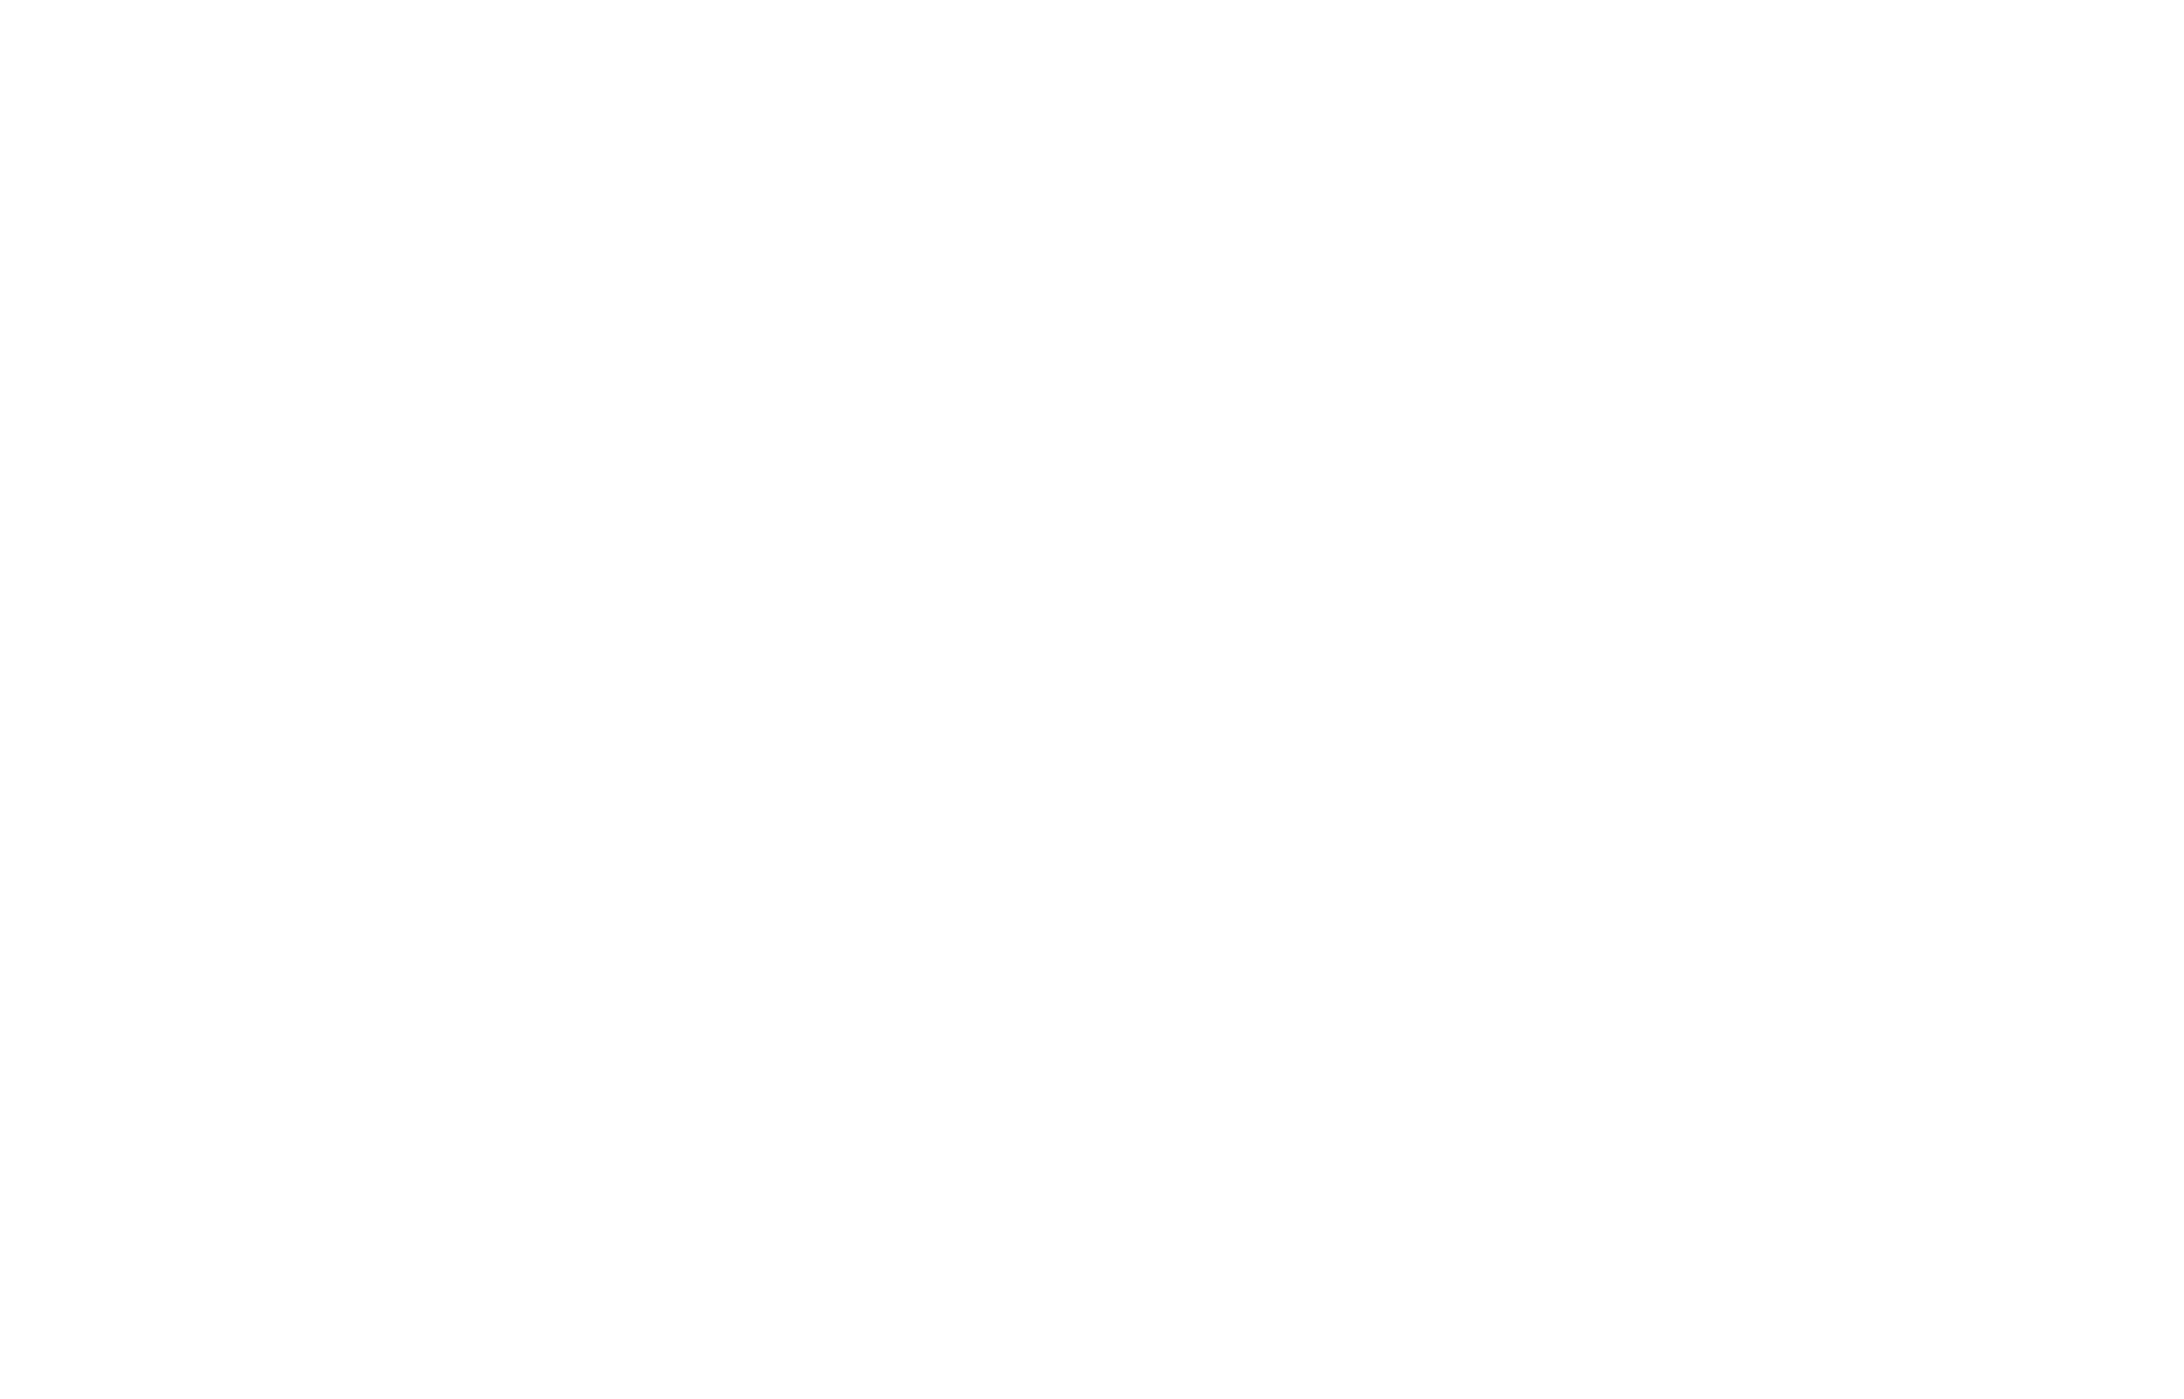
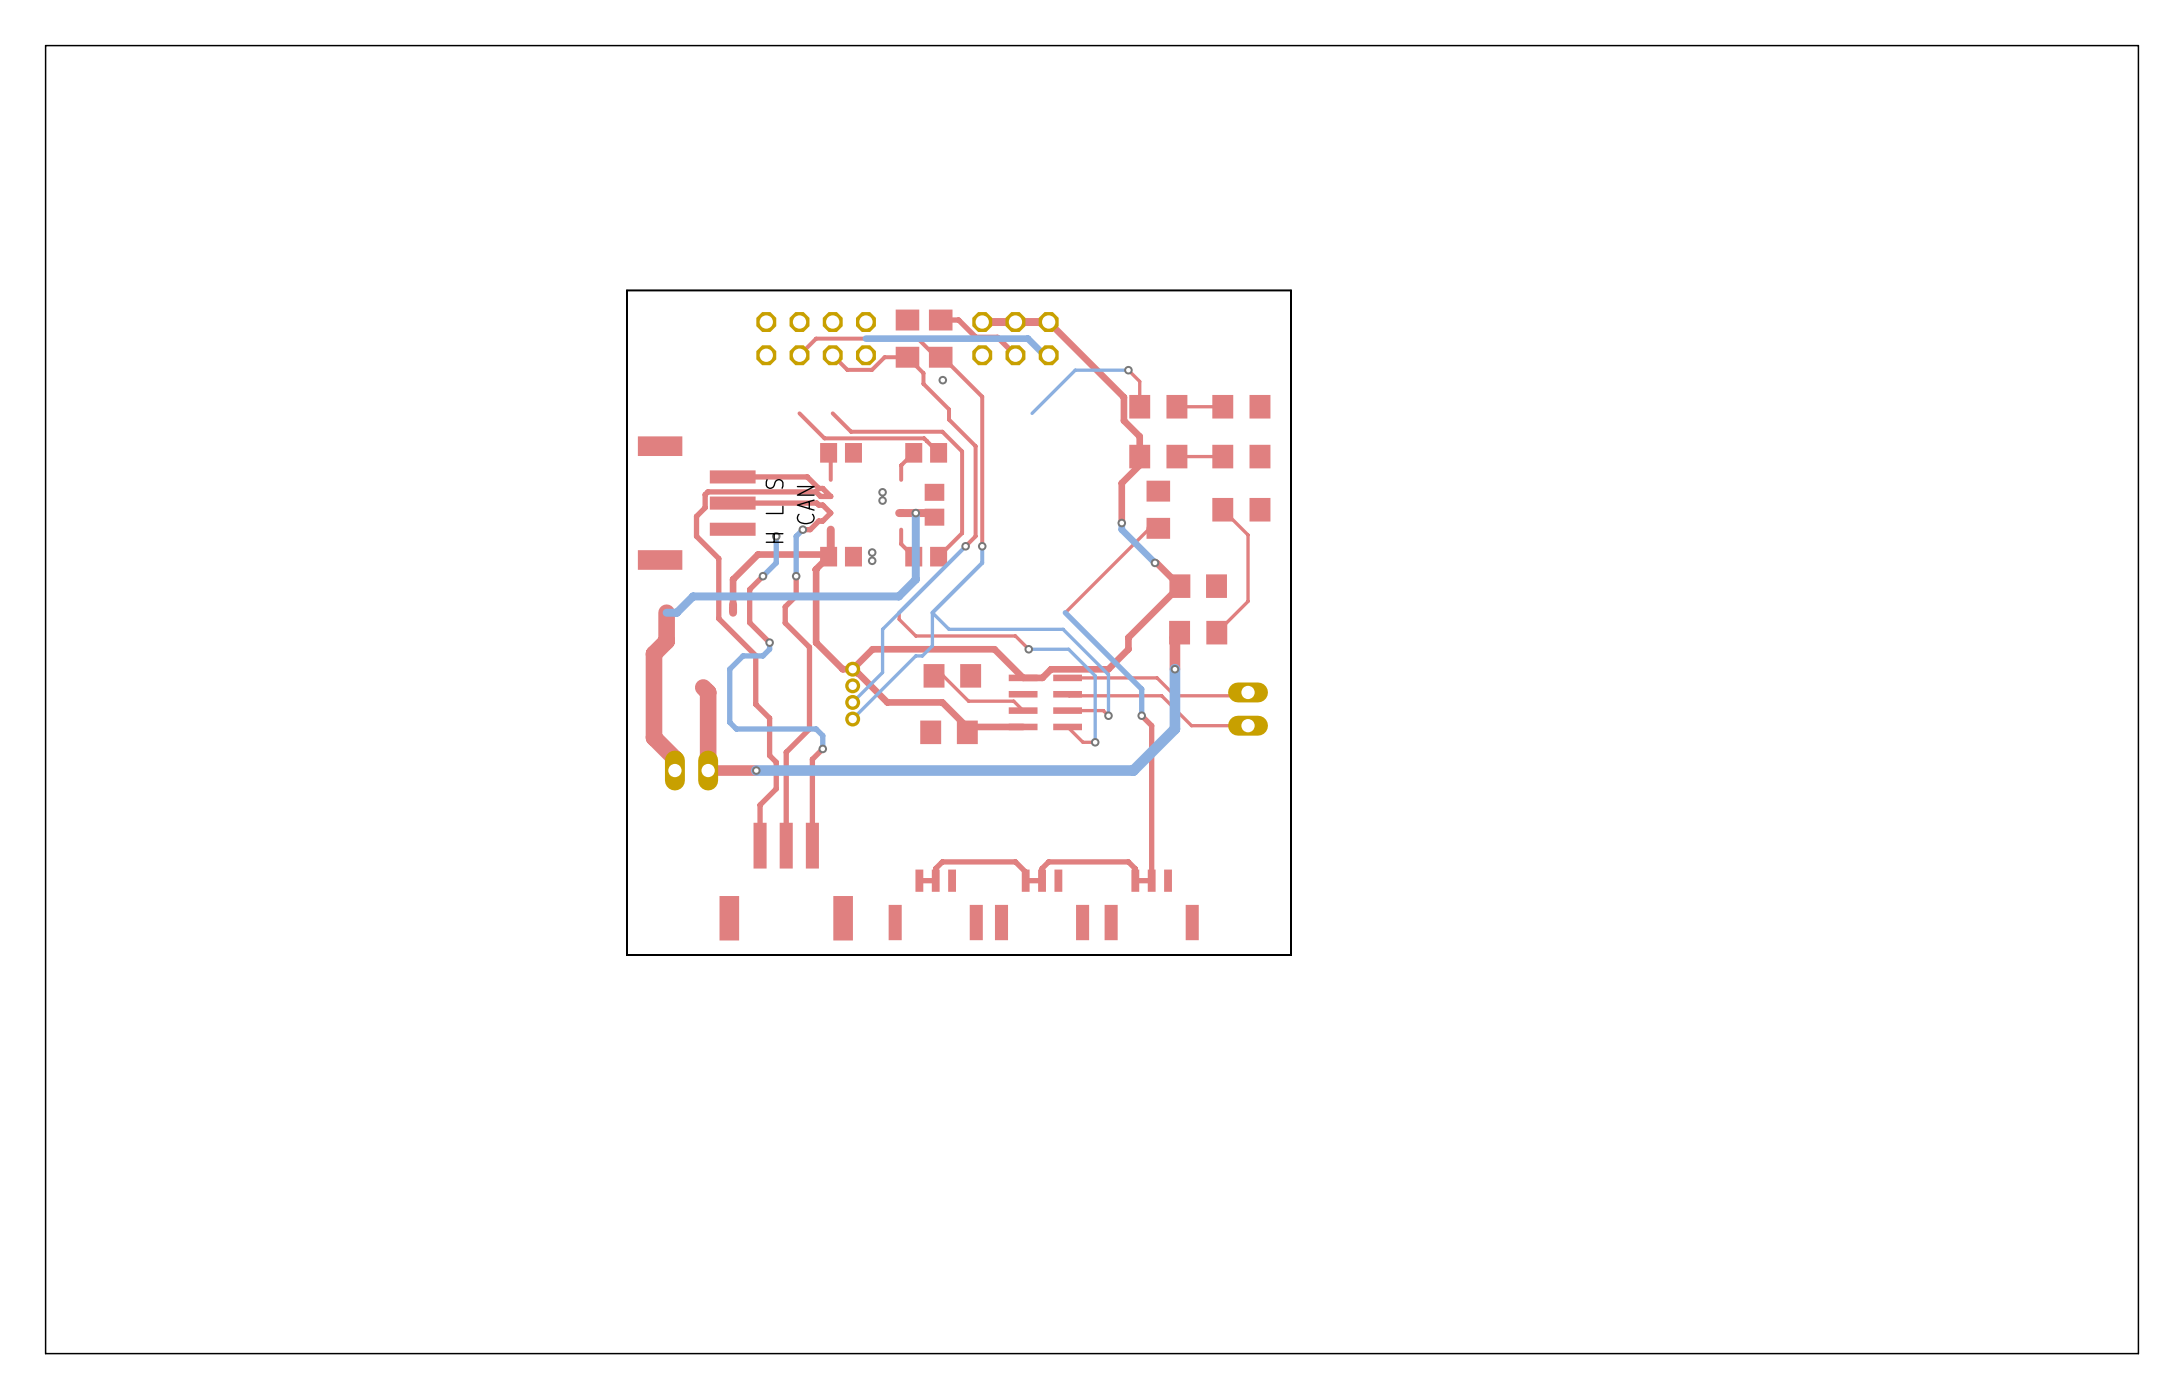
board edge: none -> (2138, 45) (45, 45) (45, 1353) (2138, 1353) (2138, 45)
board edge: none -> (1291, 290) (626, 290) (626, 954) (1291, 954) (1291, 290)
top track: none -> (940, 320) (958, 320) (975, 337) (997, 337) (1015, 355)
top track: none -> (982, 322) (1048, 322) (1123, 397) (1123, 420) (1139, 436) (1139, 465) (1121, 483) (1121, 523)
part: none -> (816, 338)
bottom track: none -> (865, 338) (1027, 338) (1044, 355) (1048, 355)
part: none -> (907, 338)
part: none -> (940, 338)
part: none -> (1015, 338)
top track: none -> (799, 355) (816, 338) (917, 338) (936, 357) (942, 357) (982, 396) (982, 546)
top track: none -> (832, 355) (847, 369) (872, 369) (884, 357) (907, 357) (923, 373) (923, 383) (949, 409) (949, 419) (975, 446) (975, 536) (965, 546)
top track: none -> (1128, 370) (1139, 381) (1139, 406)
bottom track: none -> (1128, 370) (1075, 370) (1032, 413)
via: none -> (1128, 370)
via: none -> (942, 380)
part: none -> (1158, 406)
top track: none -> (1222, 406) (1176, 406)
part: none -> (1241, 406)
top track: none -> (799, 413) (824, 438) (924, 438) (938, 452)
top track: none -> (832, 413) (851, 431) (942, 431) (962, 451) (962, 533) (938, 556)
top track: none -> (828, 452) (830, 454) (830, 479)
part: none -> (841, 452)
top track: none -> (913, 452) (901, 465) (901, 479)
part: none -> (926, 452)
part: none -> (1158, 456)
top track: none -> (1222, 456) (1176, 456)
part: none -> (1241, 456)
top track: none -> (732, 476) (807, 476) (830, 496) (820, 496) (816, 491) (707, 491) (705, 494) (705, 507) (696, 516) (696, 536) (718, 558) (718, 618) (755, 655) (755, 704) (769, 718) (769, 755) (776, 762) (776, 788) (760, 805) (760, 845)
text: none -> S (774, 483)
via: none -> (882, 492)
via: none -> (882, 500)
part: none -> (696, 503)
top track: none -> (732, 503) (816, 503) (822, 505) (830, 513) (810, 529) (802, 529)
part: none -> (934, 504)
text: none -> CAN (805, 505)
text: none -> L (774, 509)
part: none -> (1158, 509)
top track: none -> (1222, 509) (1248, 534) (1248, 601) (1216, 632)
part: none -> (1241, 509)
top track: none -> (899, 513) (932, 513) (934, 517)
bottom track: none -> (915, 513) (915, 579) (898, 596) (693, 596) (676, 612) (666, 612)
via: none -> (915, 513)
bottom track: none -> (1121, 523) (1121, 529) (1155, 562)
via: none -> (1121, 523)
top track: none -> (1158, 528) (1149, 528) (1065, 612)
bottom track: none -> (802, 529) (796, 536) (796, 576)
via: none -> (802, 529)
top track: none -> (830, 529) (830, 556)
top track: none -> (901, 529) (901, 544) (913, 556)
bottom track: none -> (776, 536) (776, 562) (762, 576)
via: none -> (776, 536)
text: none -> H (774, 537)
bottom track: none -> (965, 546) (882, 629) (882, 672) (852, 702)
via: none -> (965, 546)
bottom track: none -> (982, 546) (982, 562) (932, 612)
via: none -> (982, 546)
via: none -> (872, 552)
part: none -> (841, 556)
part: none -> (926, 556)
via: none -> (872, 560)
top track: none -> (1155, 562) (1179, 586) (1128, 637) (1128, 649) (1108, 669) (1051, 669) (1042, 677) (1023, 677) (994, 649) (872, 649) (852, 669)
via: none -> (1155, 562)
top track: none -> (762, 576) (749, 589) (749, 622) (769, 642)
via: none -> (762, 576)
top track: none -> (796, 576) (796, 595) (785, 606) (785, 623) (809, 647) (809, 729) (786, 752) (786, 845)
via: none -> (796, 576)
part: none -> (1198, 586)
top track: none -> (733, 604) (733, 612)
top track: none -> (733, 609) (733, 579) (758, 554) (830, 554) (815, 569) (816, 642) (842, 669) (852, 669)
top track: none -> (666, 612) (666, 641) (653, 653) (653, 737) (674, 758) (674, 770)
top track: none -> (899, 612) (899, 619) (915, 635) (1015, 635) (1028, 649)
bottom track: none -> (932, 612) (949, 629) (1063, 629) (1108, 674) (1108, 715)
bottom track: none -> (932, 612) (932, 645) (922, 655) (915, 655) (852, 719)
bottom track: none -> (1065, 612) (1141, 689) (1141, 715)
top track: none -> (1179, 632) (1174, 637) (1174, 669)
part: none -> (1198, 632)
bottom track: none -> (769, 642) (769, 649) (762, 655) (743, 655) (729, 669) (729, 722) (736, 729) (816, 729) (822, 735) (822, 748)
via: none -> (769, 642)
bottom track: none -> (1028, 649) (1068, 649) (1095, 675) (1095, 742)
via: none -> (1028, 649)
top track: none -> (852, 669) (887, 702) (942, 702) (967, 727) (967, 732) (972, 726) (1023, 726)
bottom track: none -> (1174, 669) (1174, 729) (1133, 770) (756, 770)
via: none -> (1174, 669)
top track: none -> (934, 675) (943, 675) (968, 701) (1013, 701) (1023, 710)
part: none -> (952, 675)
top track: none -> (1067, 677) (1157, 677) (1174, 695) (1244, 695) (1248, 692)
top track: none -> (703, 687) (708, 692) (708, 770) (756, 770)
part: none -> (852, 694)
top track: none -> (1067, 694) (1069, 695) (1161, 695) (1191, 725) (1248, 725)
part: none -> (1045, 702)
part: none -> (1248, 709)
top track: none -> (1067, 710) (1103, 710) (1108, 715)
via: none -> (1108, 715)
top track: none -> (1141, 715) (1151, 725) (1151, 880) (1135, 880) (1135, 868) (1128, 861) (1048, 861) (1042, 868) (1042, 880) (1025, 880) (1025, 872) (1015, 861) (942, 861) (935, 868) (935, 880) (919, 880)
via: none -> (1141, 715)
top track: none -> (1067, 726) (1082, 742) (1095, 742)
part: none -> (949, 732)
via: none -> (1095, 742)
top track: none -> (822, 748) (812, 759) (812, 845)
via: none -> (822, 748)
part: none -> (691, 770)
via: none -> (756, 770)
part: none -> (786, 881)
part: none -> (935, 904)
part: none -> (1042, 904)
part: none -> (1151, 904)

